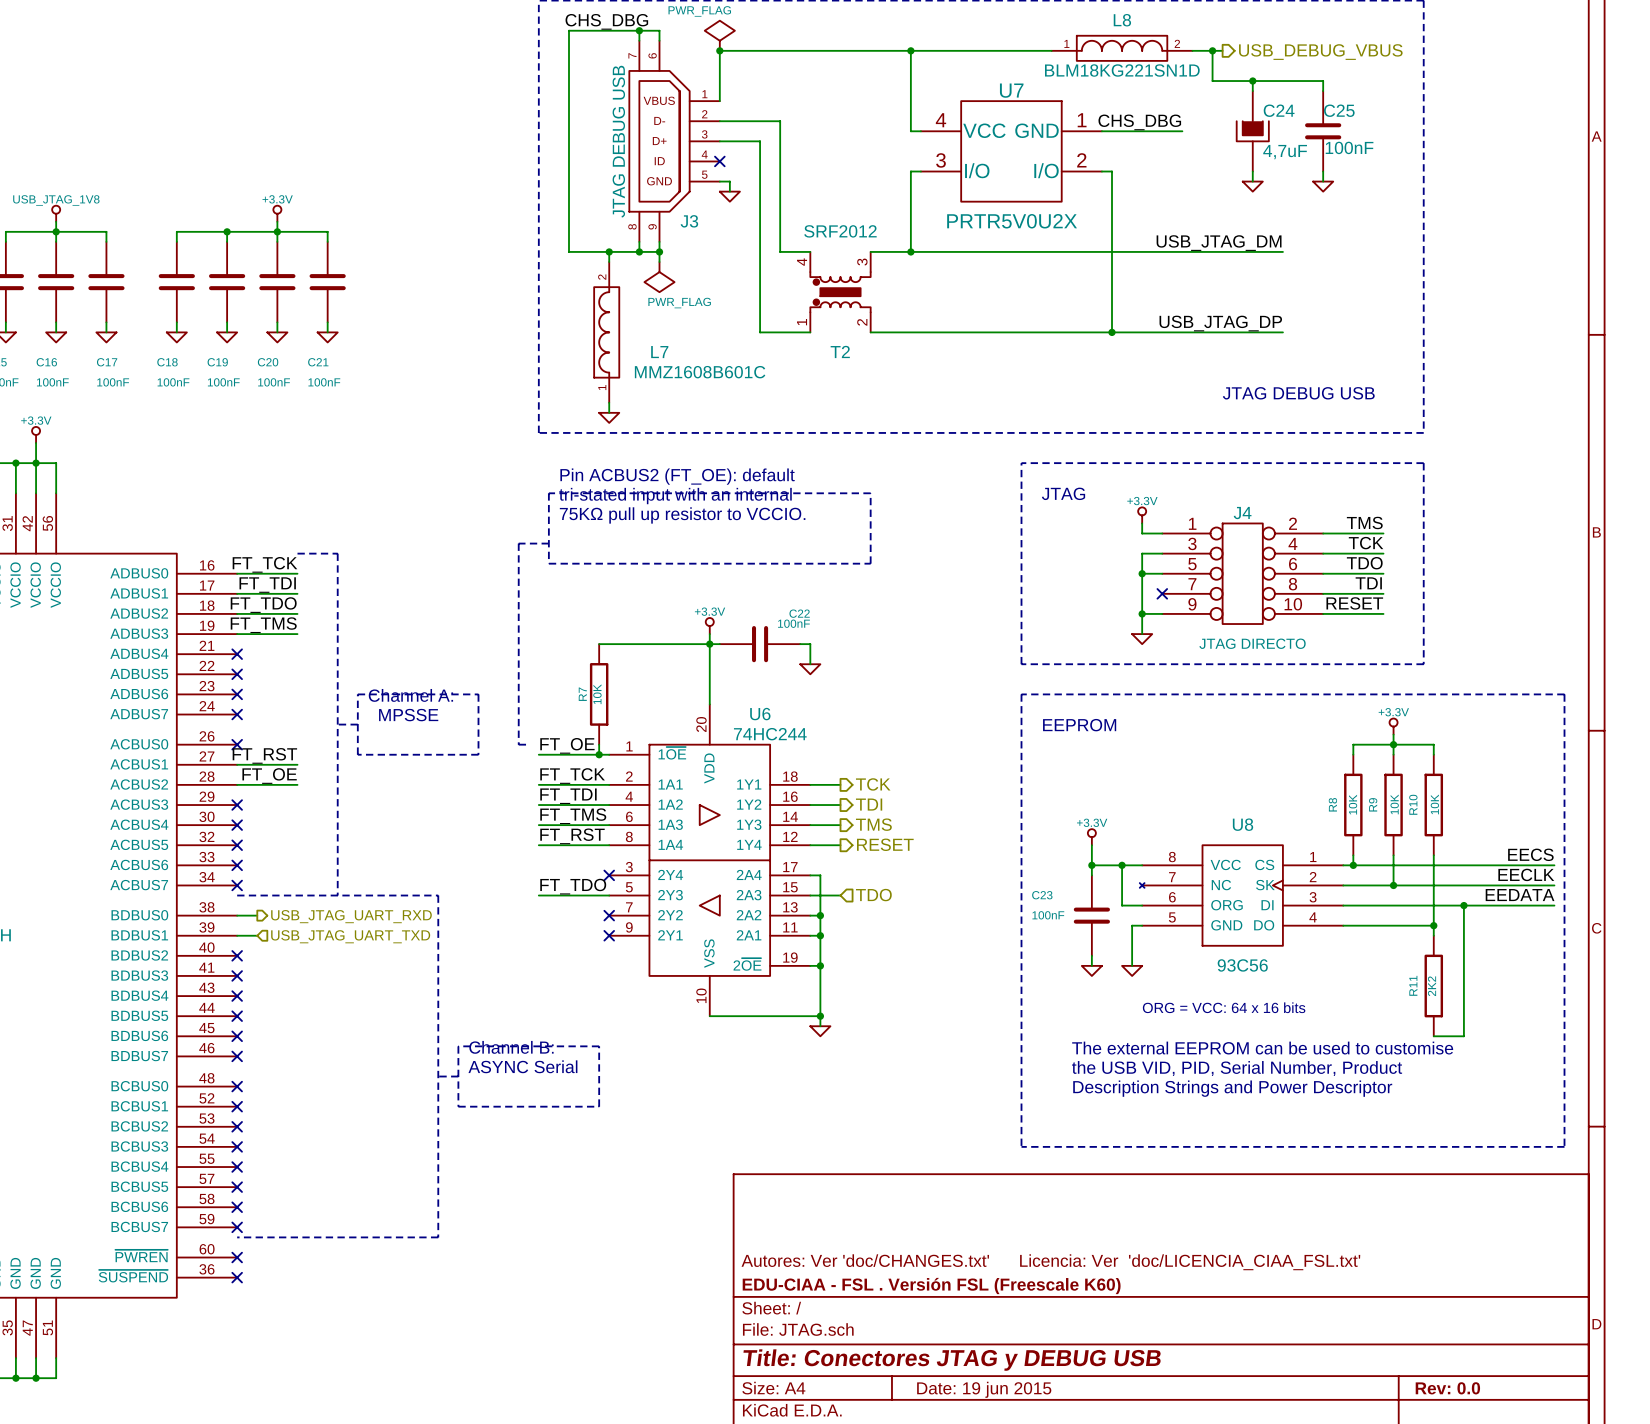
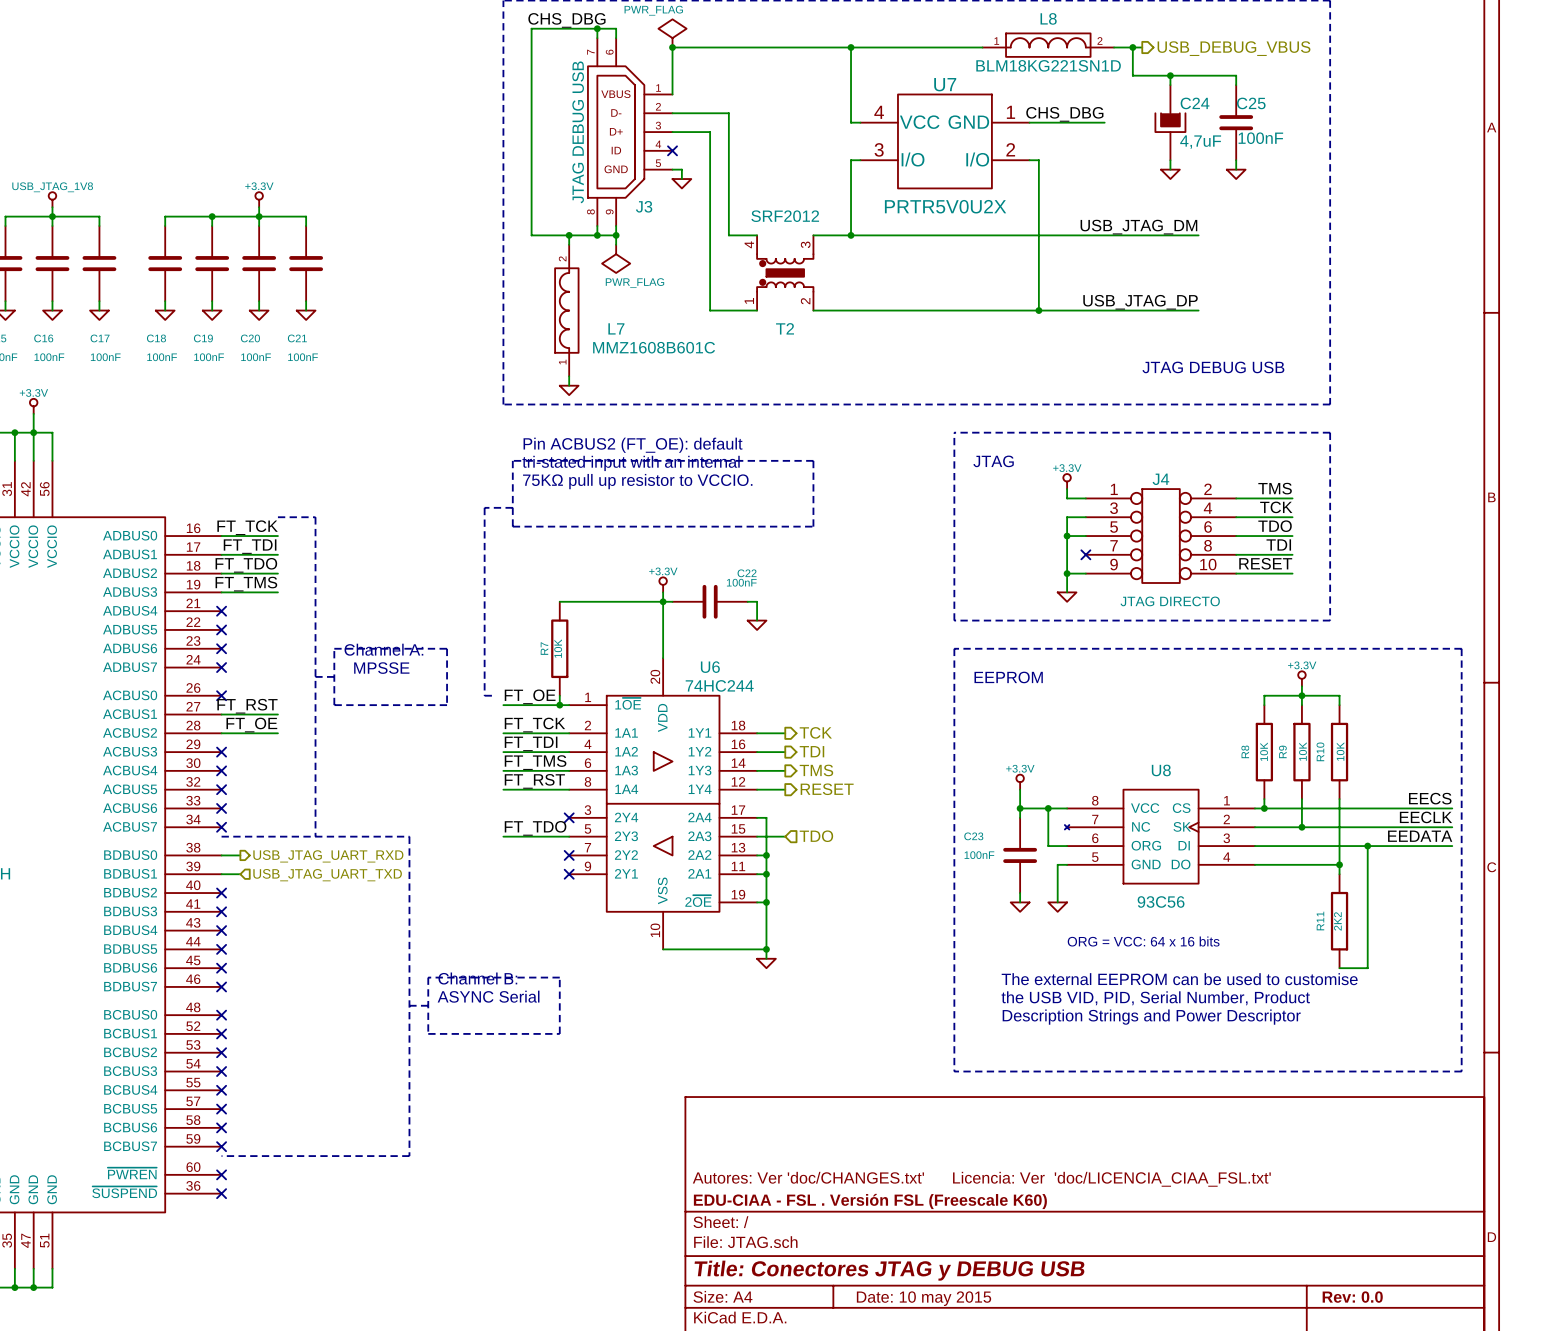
title block: Date: 19 jun 2015 (984, 1389) -> Date: 10 may 2015 (924, 1298)

